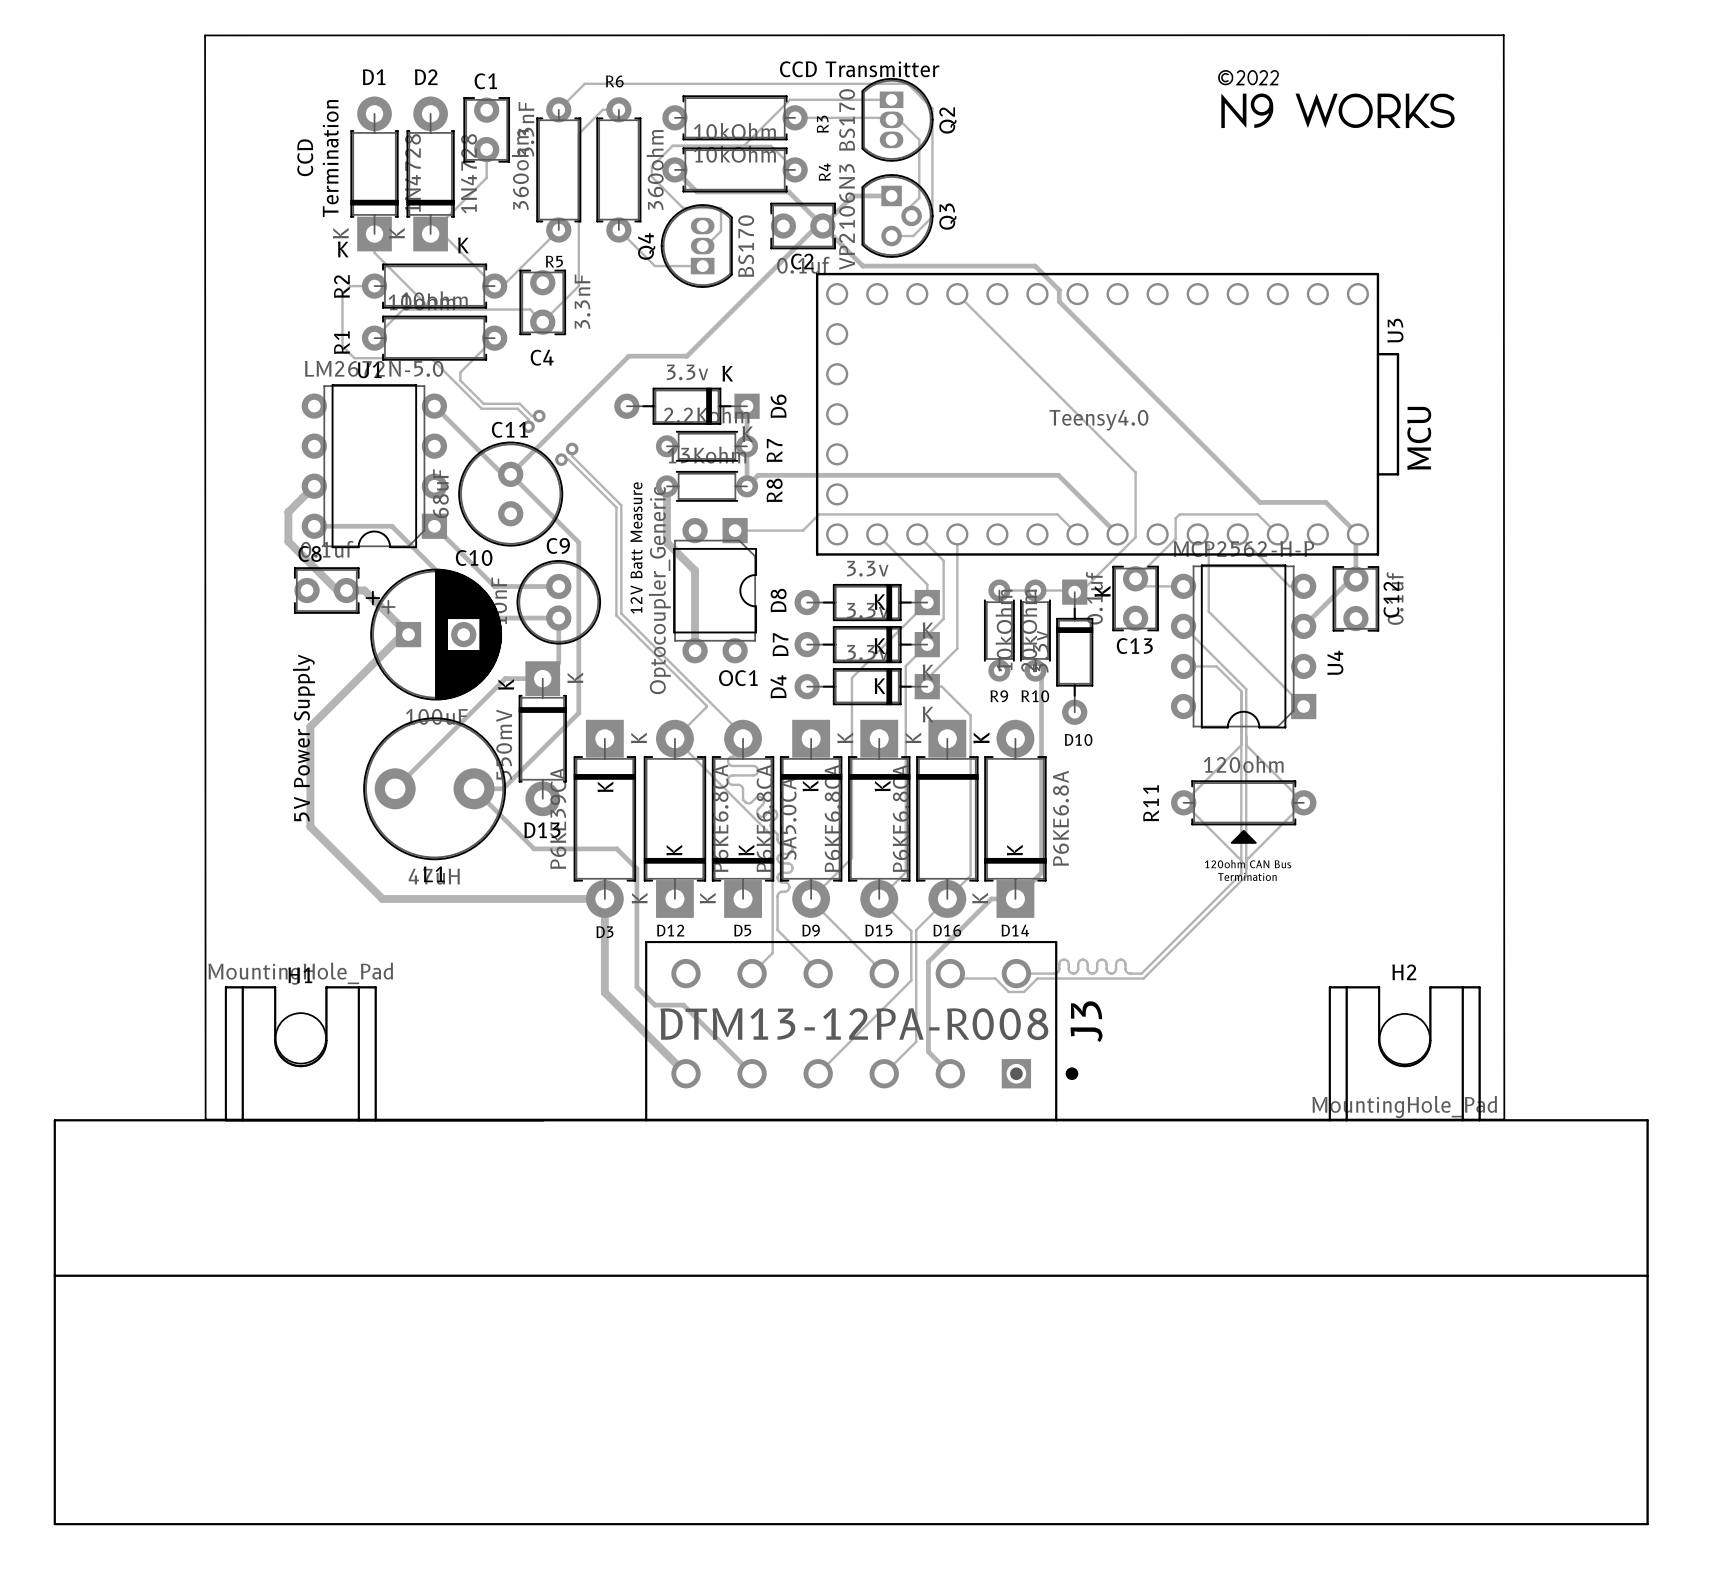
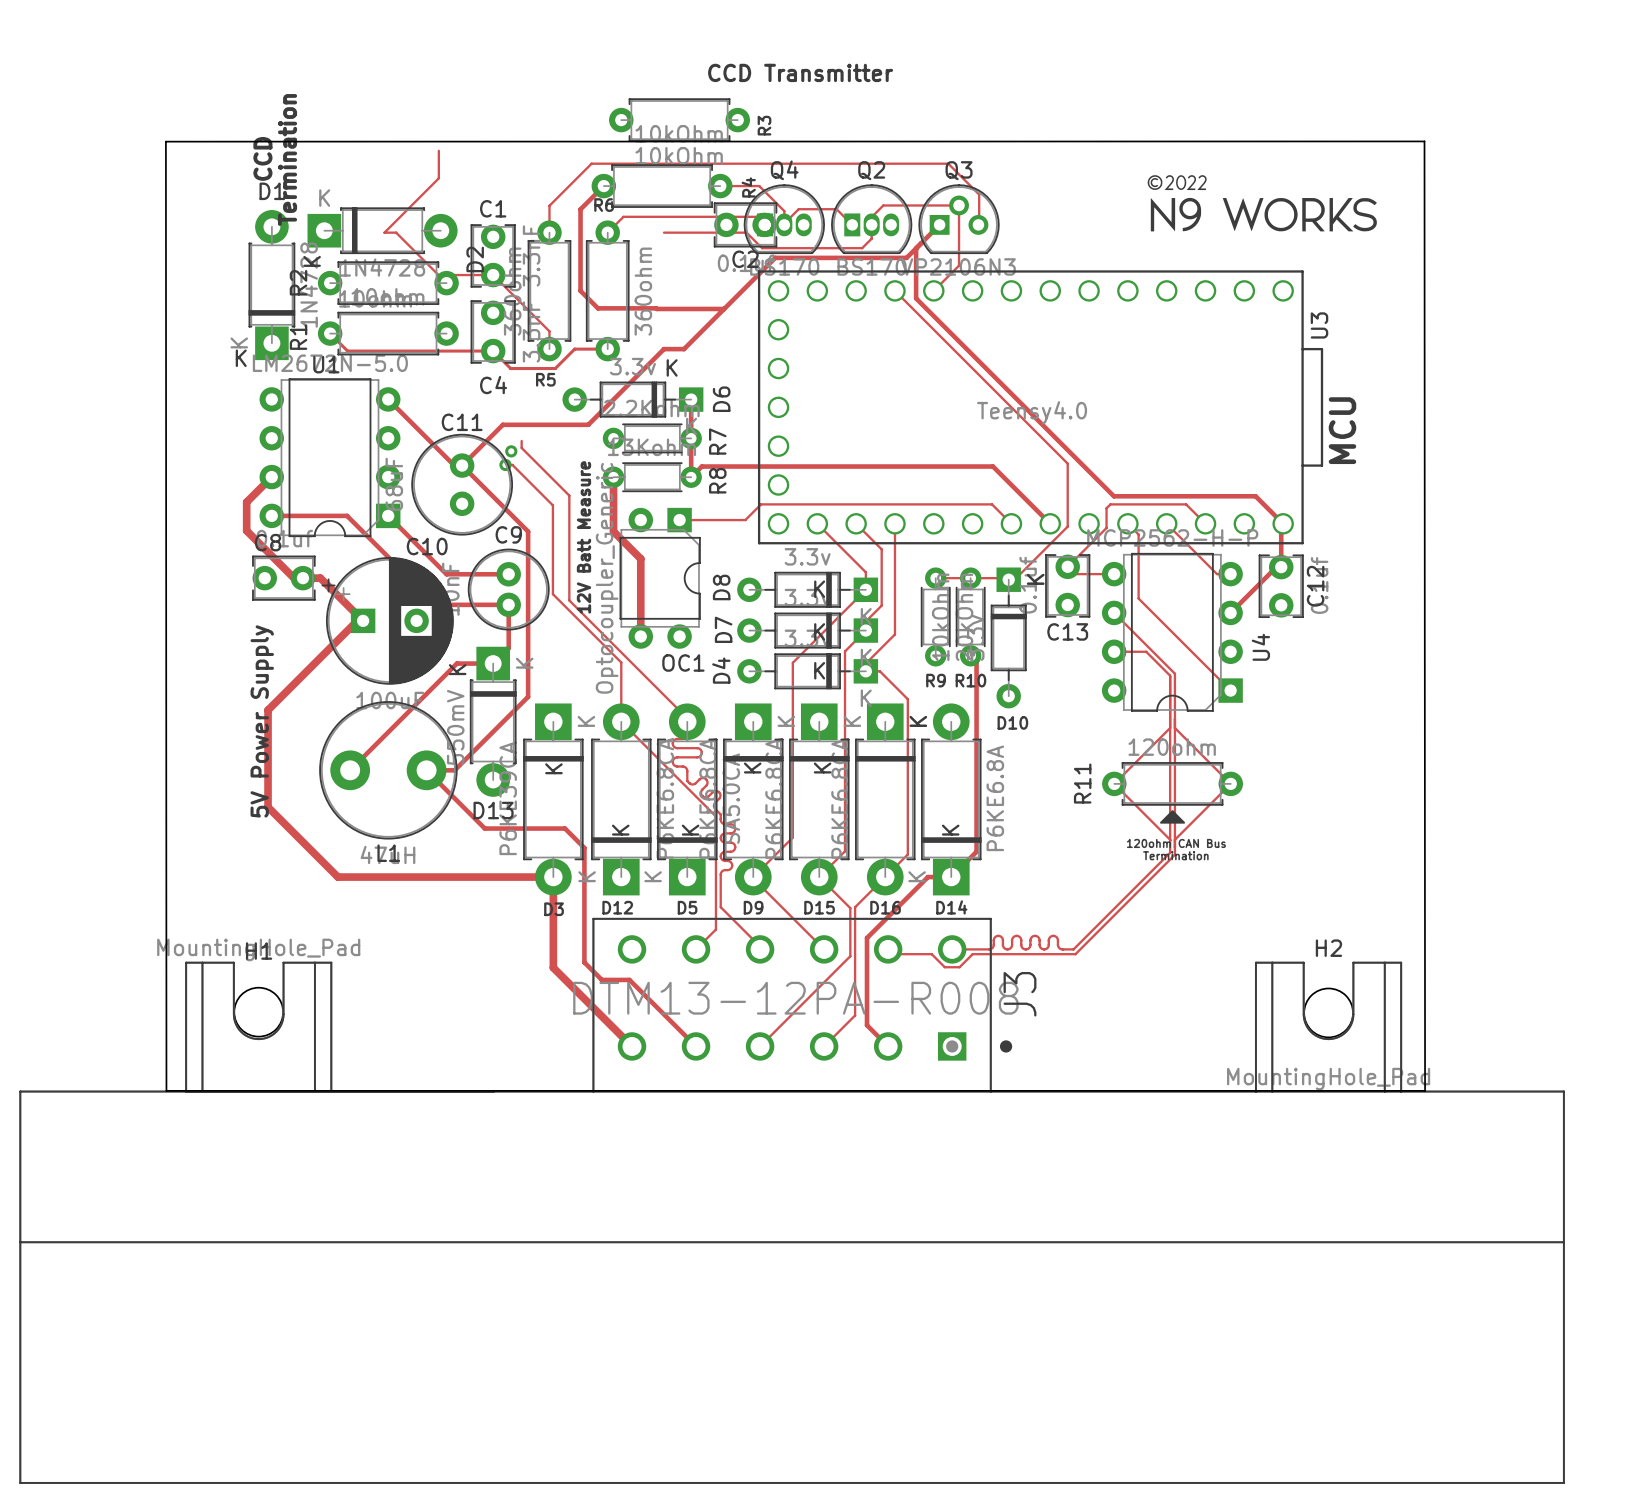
D2 name position: D2 (426, 77) -> D2 (475, 259)
track: (891, 99) (790, 99) (743, 145) -> none
drawing position: (1336, 99) -> (1262, 203)
track: (558, 109) (584, 83) (907, 83) (932, 108) (932, 216) (913, 236) (891, 236) -> none
track: (618, 109) (602, 109) (578, 133) (578, 286) (542, 322) (530, 309) (403, 309) (374, 338) -> (607, 349) (574, 349) (555, 368) (510, 368) (493, 351) (347, 351) (330, 333)
track: (795, 117) (889, 117) (891, 119) -> none
track: (890, 119) (899, 119) (919, 139) (919, 197) (911, 205) (911, 215) -> none
Q2 rotation: 0° (897, 119) -> 90° counterclockwise (871, 219)
Q2 position: (897, 119) -> (871, 219)
C1 position: (486, 129) -> (493, 255)
R5 position: (558, 169) -> (549, 290)
R6 position: (618, 169) -> (607, 290)
track: (674, 169) (696, 191) (788, 191) (862, 266) (1035, 266) (1059, 290) (1059, 301) (1260, 502) (1325, 502) (1329, 506) -> (916, 248) (916, 298) (1113, 496) (1255, 496)
R4 position: (735, 169) -> (662, 186)
track: (795, 169) (771, 145) (672, 145) (651, 166) (651, 176) (682, 207) (721, 207) (721, 231) (706, 246) (702, 246) -> none
D1 position: (374, 173) -> (271, 285)
D2 rotation: 0° (430, 173) -> 90° clockwise (382, 230)
track: none -> (603, 186) (580, 209) (580, 290) (598, 308) (724, 308)
track: none -> (720, 186) (759, 186) (784, 211) (784, 224)
track: (891, 195) (852, 195) (822, 226) (817, 226) (686, 356) (628, 356) (552, 432) -> (939, 224) (906, 257) (775, 257) (684, 349) (663, 349) (588, 424) (502, 424)
Q3 rotation: 0° (897, 215) -> 90° counterclockwise (959, 219)
Q3 position: (897, 215) -> (959, 219)
track: none -> (784, 223) (798, 209) (836, 209) (852, 224)
track: none -> (764, 224) (756, 216) (623, 216) (607, 232)
track: none -> (978, 224) (979, 194) (948, 163) (591, 163) (549, 205) (549, 232)
track: (558, 230) (502, 286) (494, 286) -> (549, 349) (549, 331) (493, 275) (454, 275) (446, 283)
track: (618, 230) (654, 266) (702, 266) -> none
track: (374, 234) (374, 252) (431, 309) -> none
track: none -> (663, 232) (746, 232) (762, 248) (862, 248) (871, 238) (871, 217) (883, 205) (959, 205) (959, 265) (933, 290)
Q4 rotation: 0° (696, 246) -> 90° clockwise (784, 219)
Q4 position: (696, 246) -> (784, 219)
track: (374, 286) (350, 286) (342, 294) (342, 346) (354, 358) (431, 358) (481, 408) (517, 408) (528, 419) (528, 426) -> none
C4 position: (542, 302) -> (493, 331)
track: (494, 338) (460, 372) (460, 380) (483, 403) (519, 403) (532, 416) (539, 416) -> none
via: (539, 416) -> none
via: (528, 426) -> none
via: (572, 448) -> none
track: (561, 459) (568, 459) (616, 507) (616, 615) (706, 705) (674, 738) -> (505, 464) (512, 464) (552, 505) (552, 594) (621, 662) (621, 721)
via: none -> (505, 464)
board edge: (205, 1119) (205, 35) (1503, 35) (1504, 1119) -> (166, 1090) (165, 141) (1424, 141) (1425, 1090)

